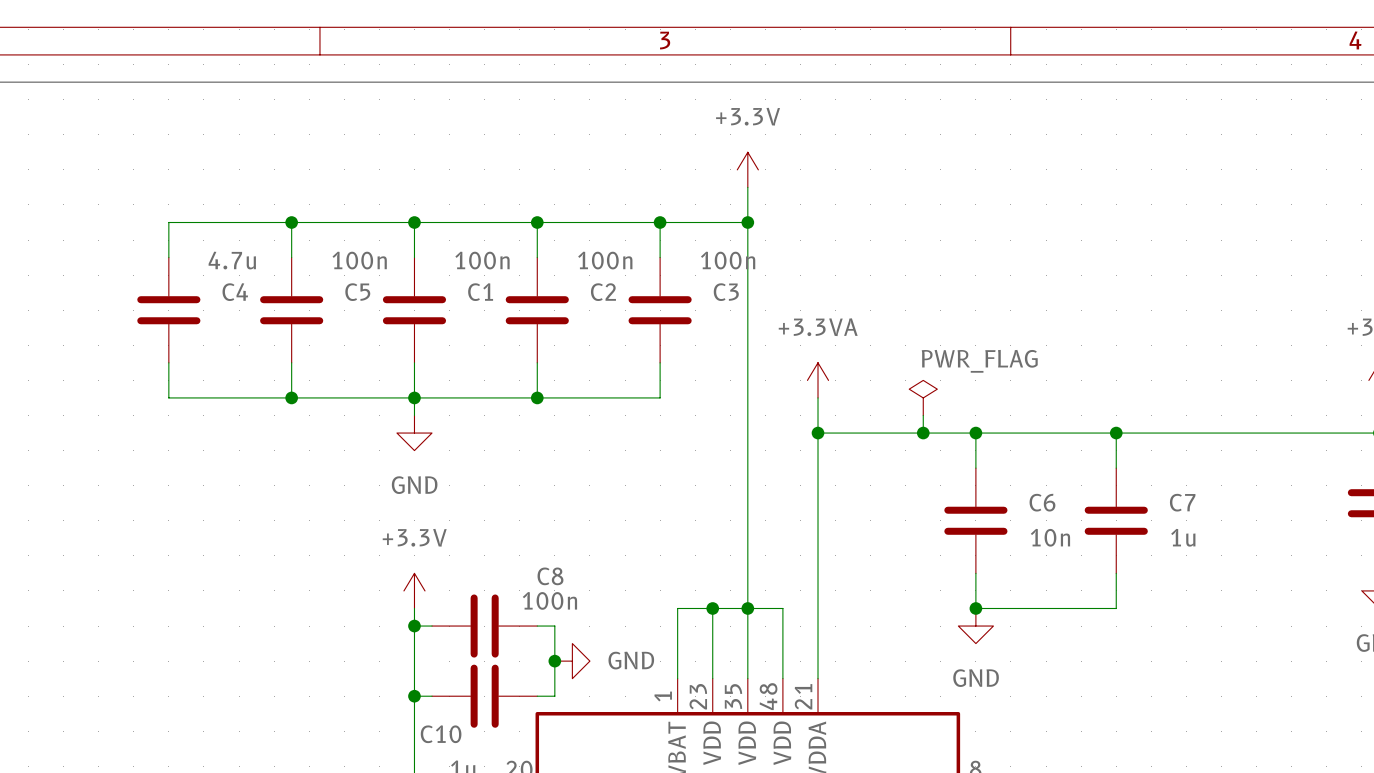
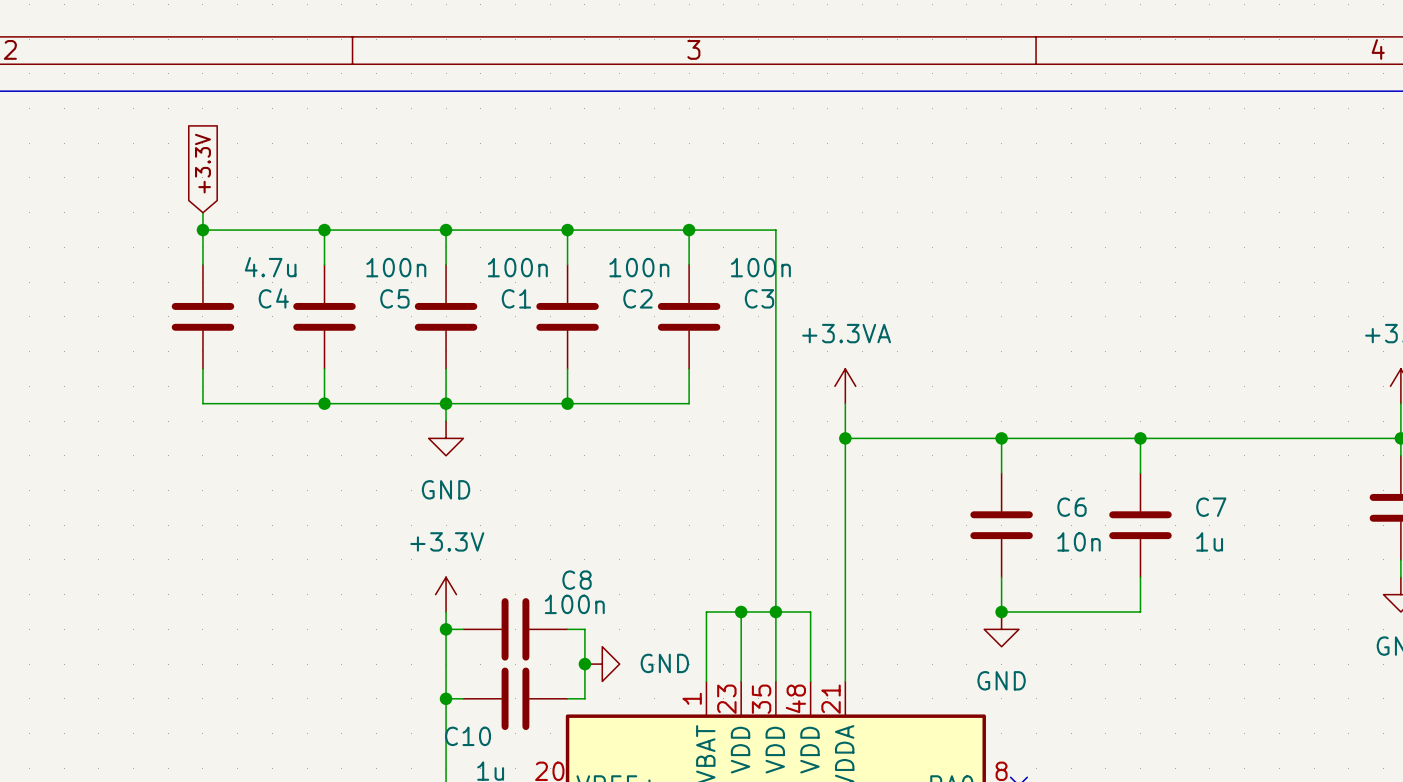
global label: none -> +3.3V (202, 163)
power symbol: +3.3V (747, 169) -> none
wire: (747, 187) (747, 222) -> none
wire: none -> (202, 212) (202, 230)
junction: none -> (202, 230)
junction: (747, 222) -> none
power symbol: PWR_FLAG (923, 397) -> none
wire: (923, 415) (923, 433) -> none
junction: (923, 433) -> none

